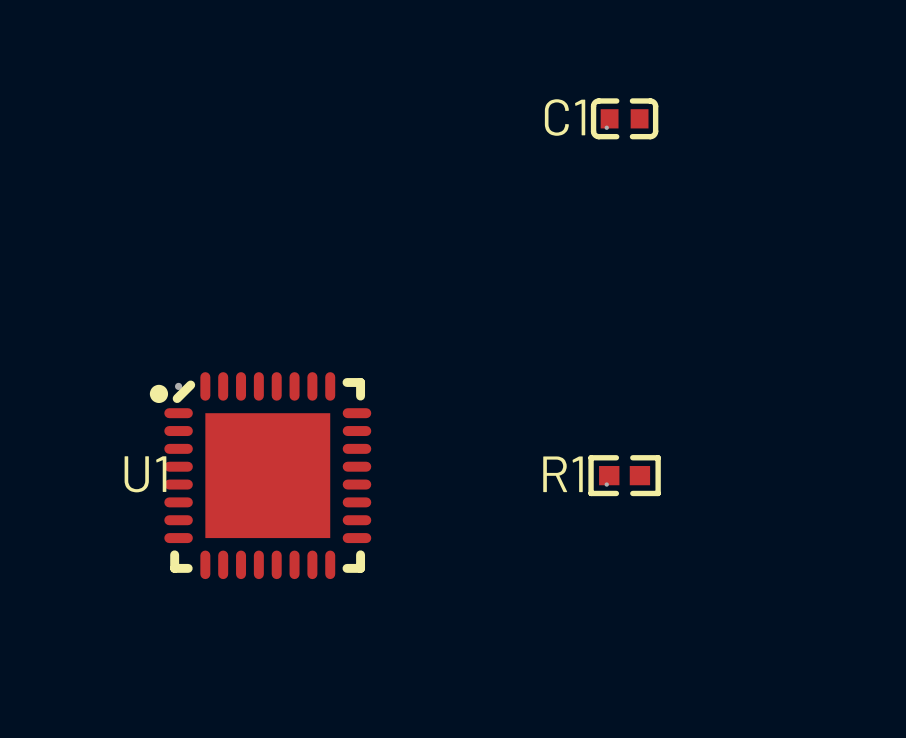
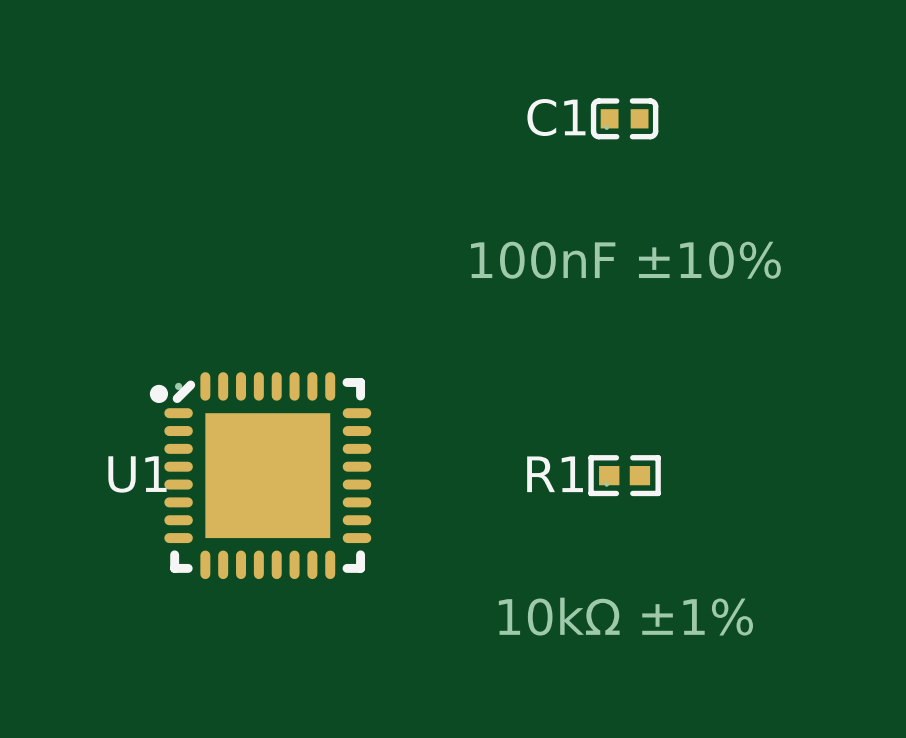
C1 value: none -> 100nF ±10% (625, 260)
R1 value: none -> 10kΩ ±1% (625, 616)

